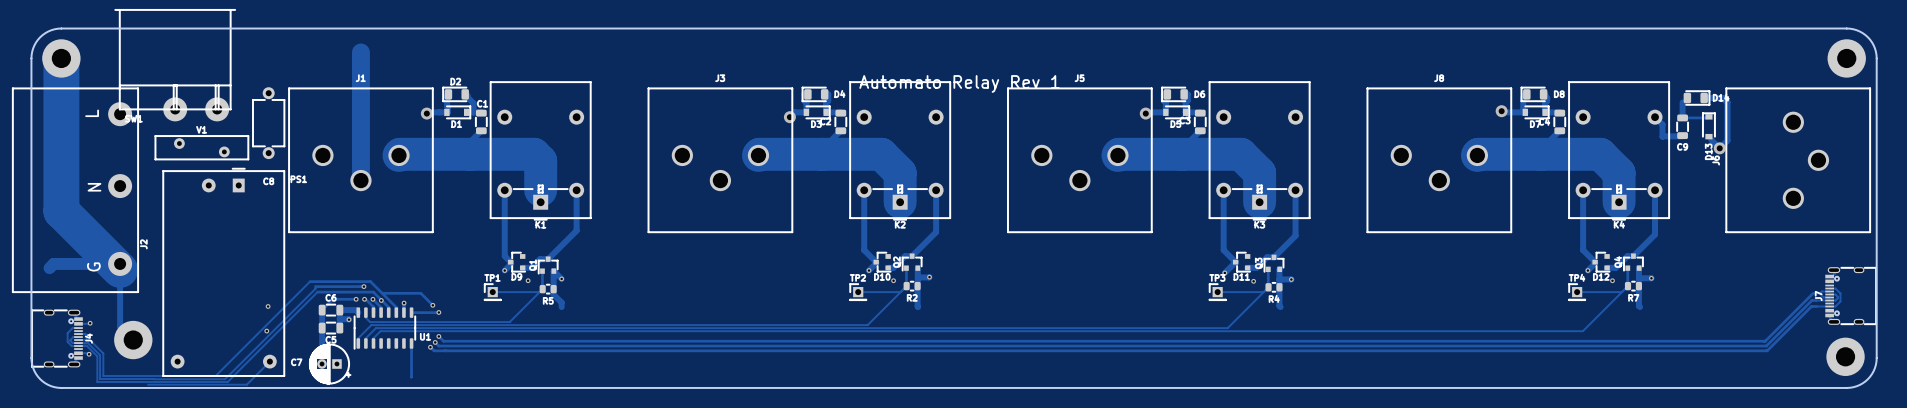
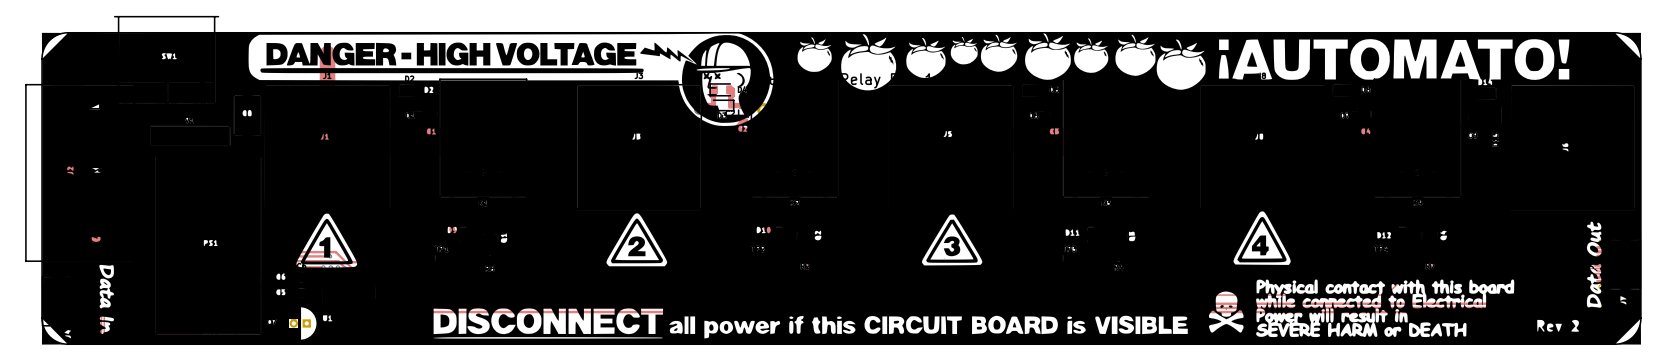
drawing: none -> [41, 32, 1641, 345]

